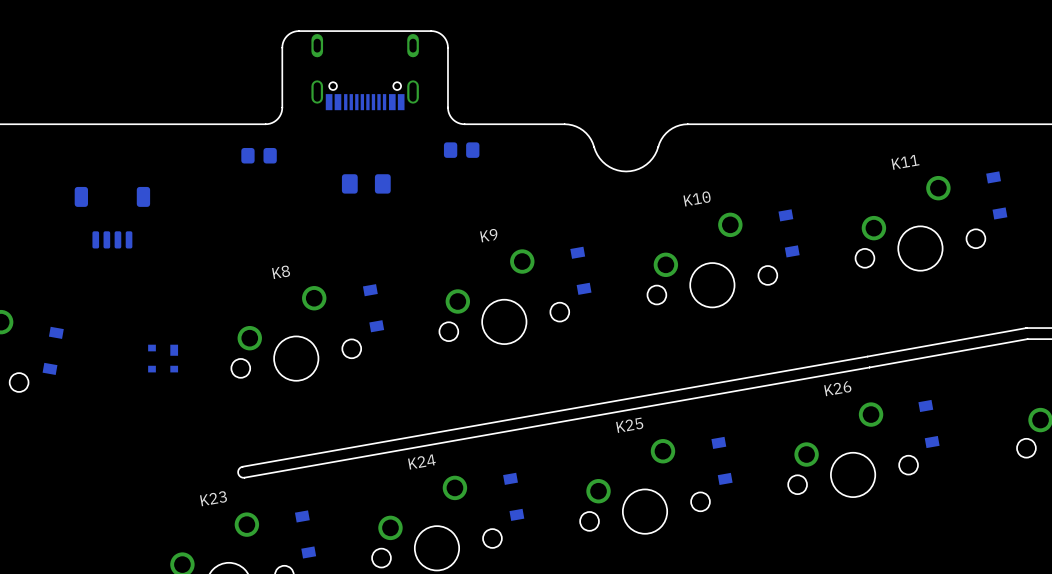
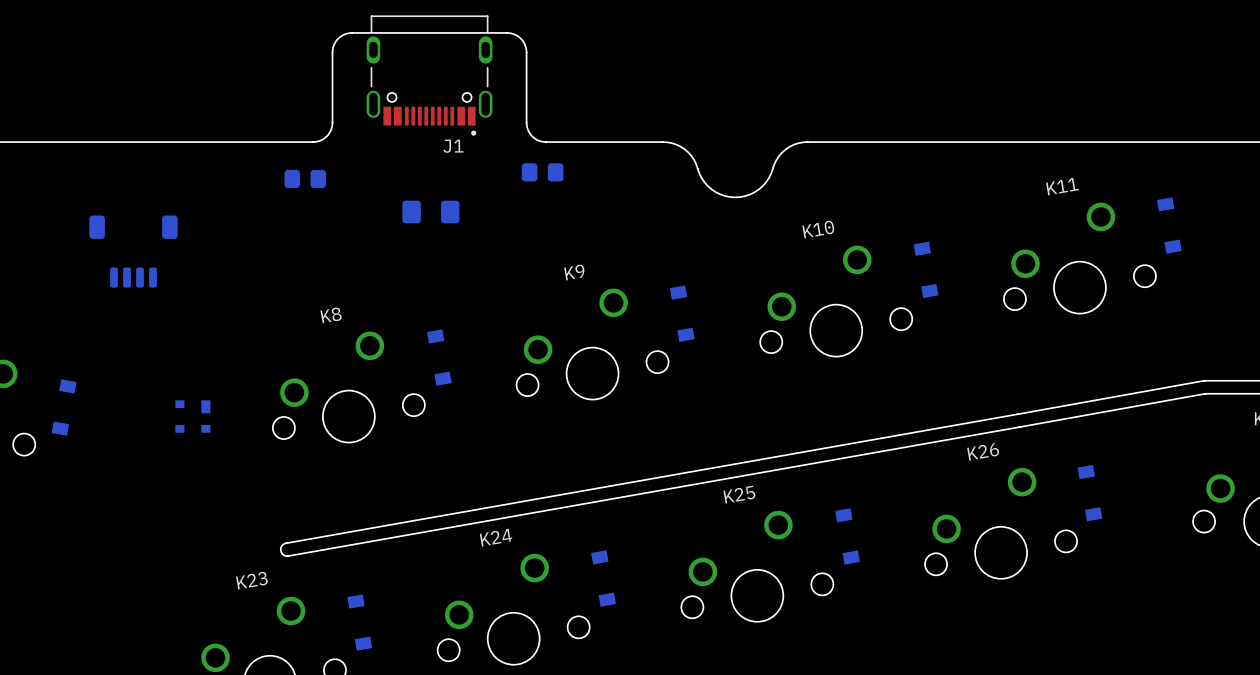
J1 side: bottom (365, 72) -> top (429, 75)

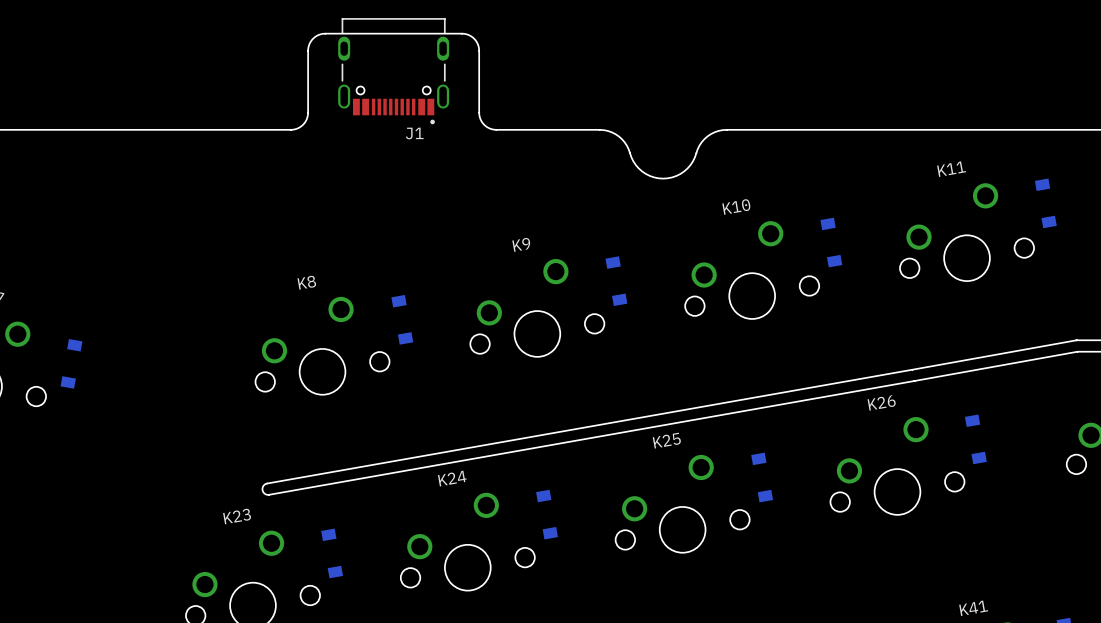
part: (542, 172) -> none
part: (305, 178) -> none
part: (430, 211) -> none
part: (133, 251) -> none
part: (192, 416) -> none

